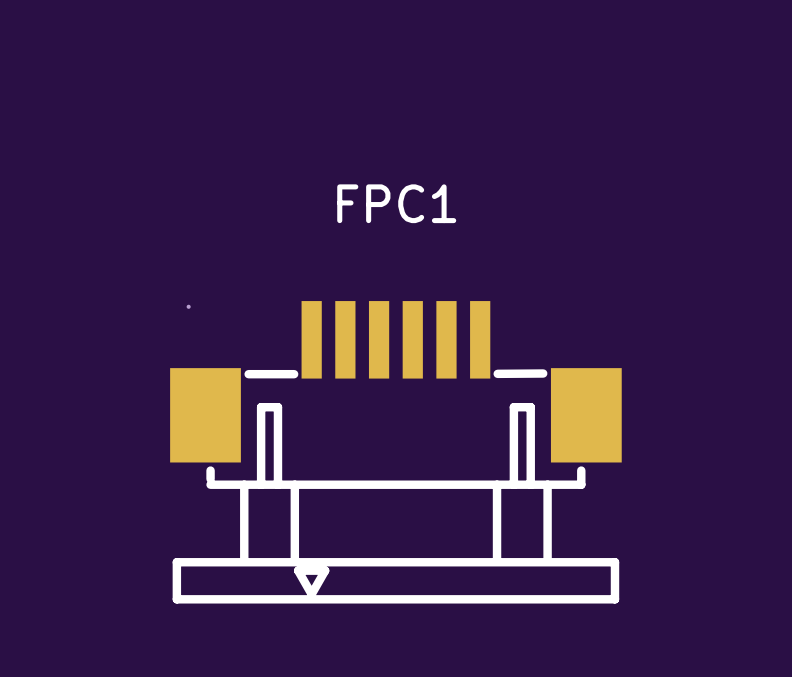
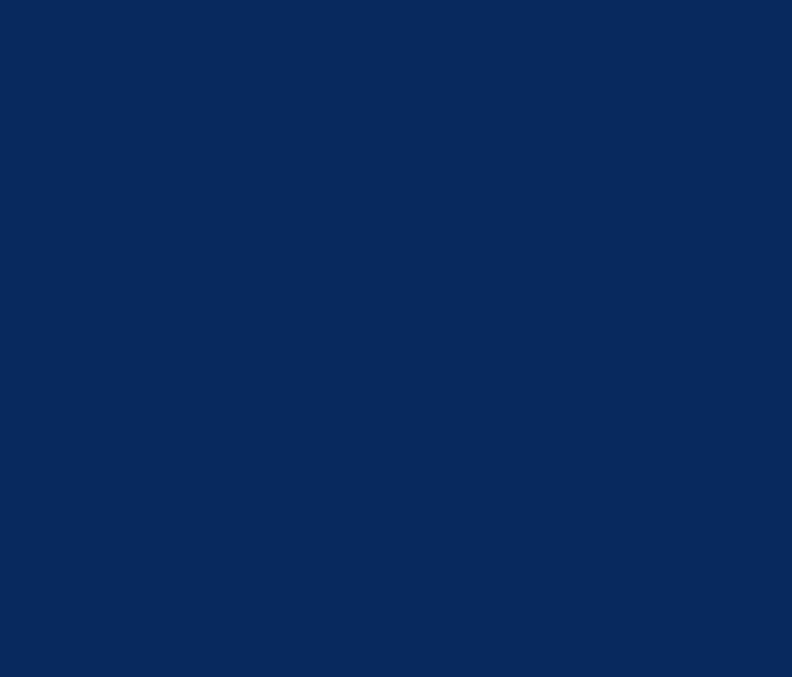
FPC1: (395, 452) -> none

